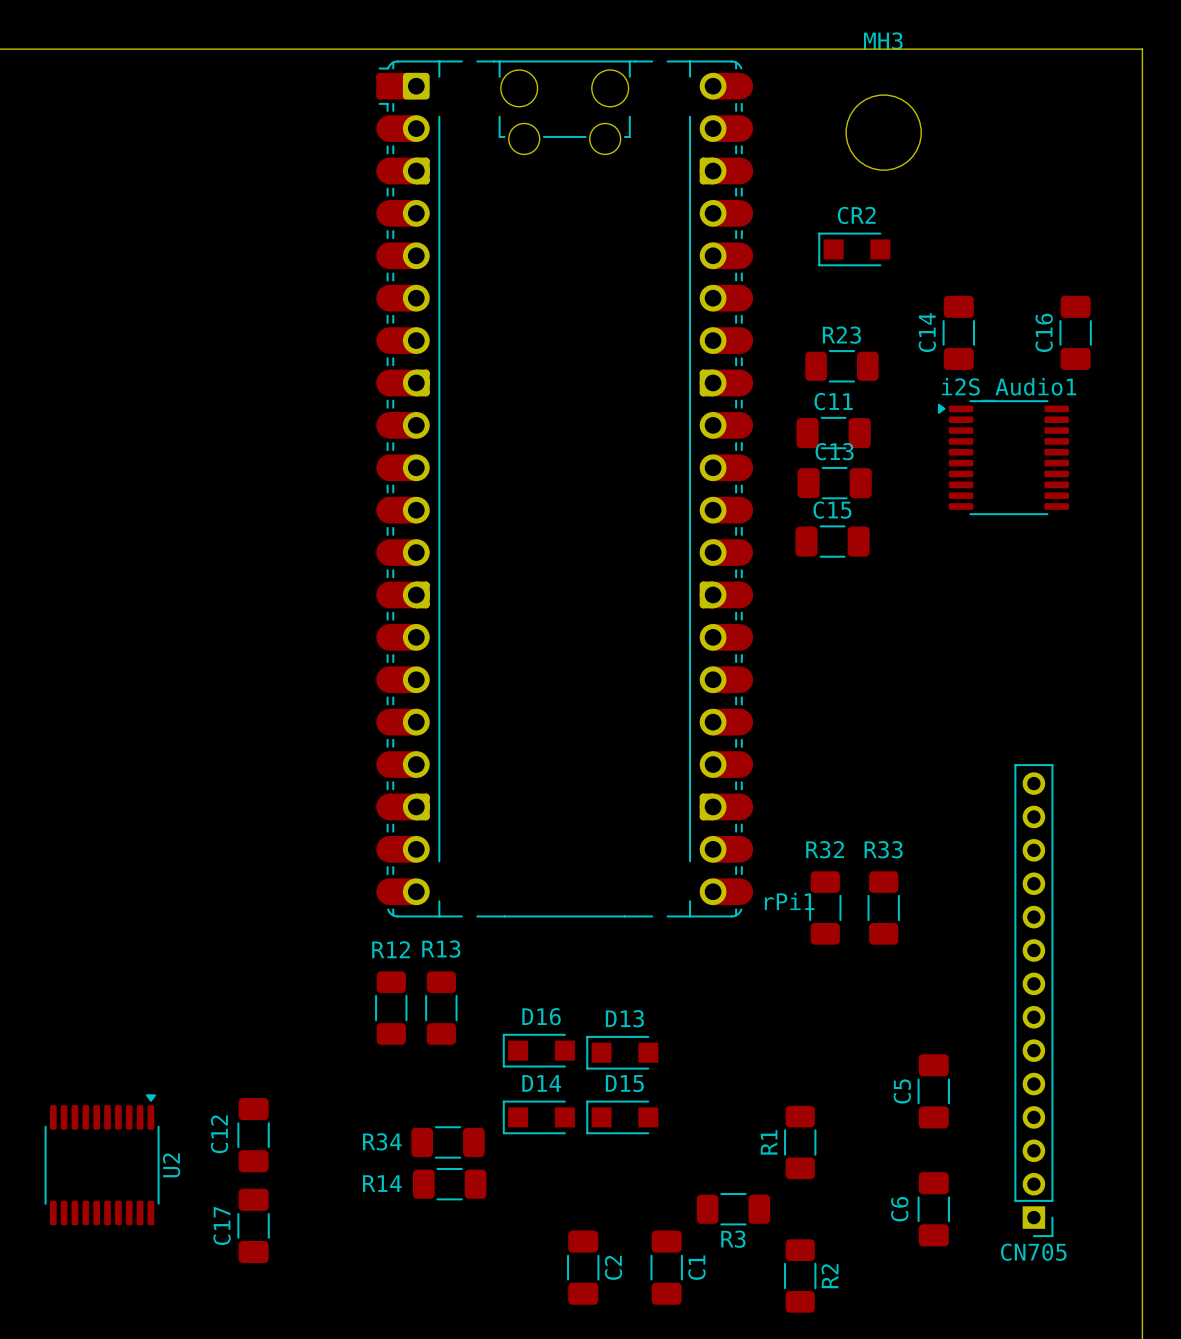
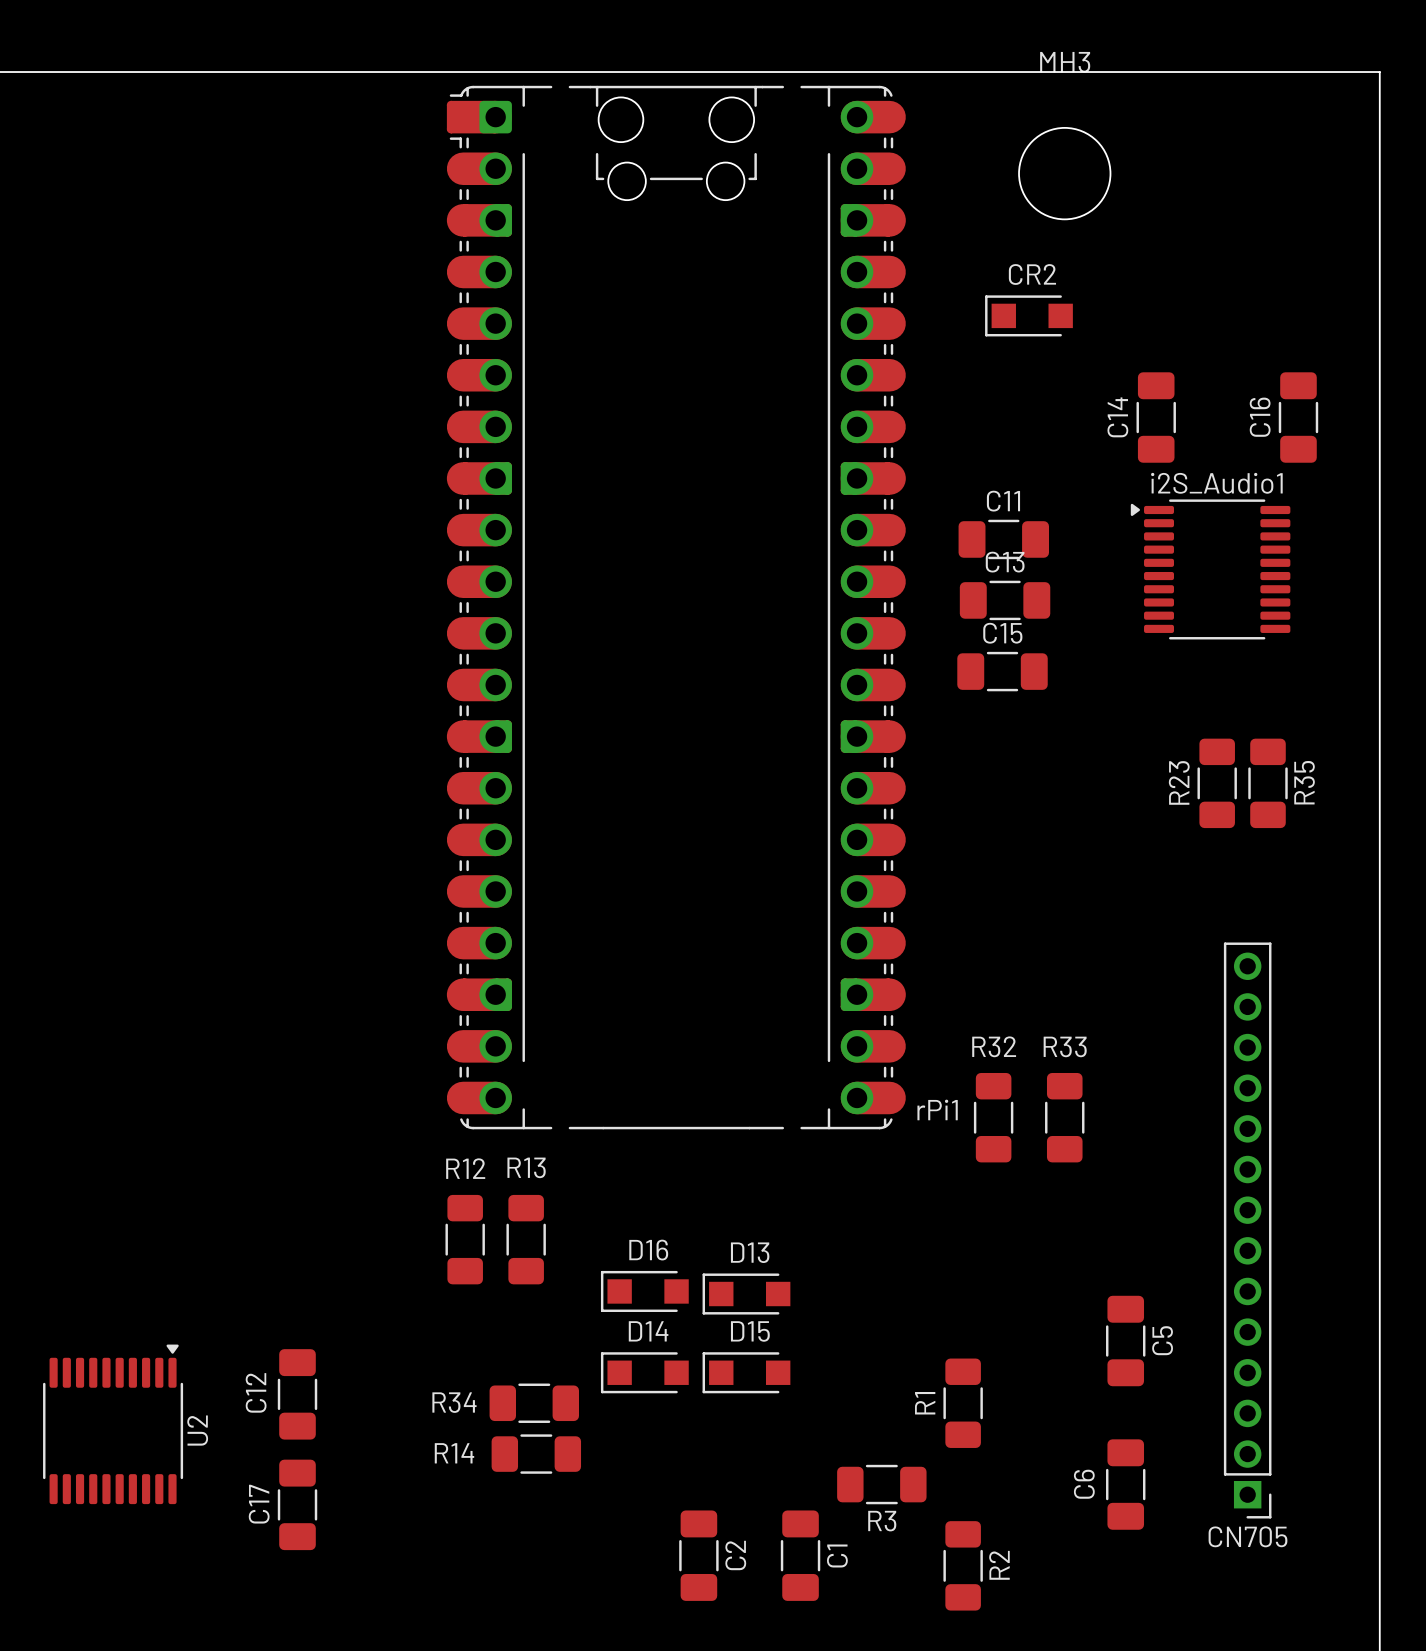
R23 name position: R23 (841, 335) -> R23 (1179, 782)
R23 rotation: 0° (841, 366) -> 90° clockwise (1217, 783)
R23 position: (841, 366) -> (1217, 783)
R35: none -> (1268, 783)
C5 name position: C5 (902, 1091) -> C5 (1162, 1340)

